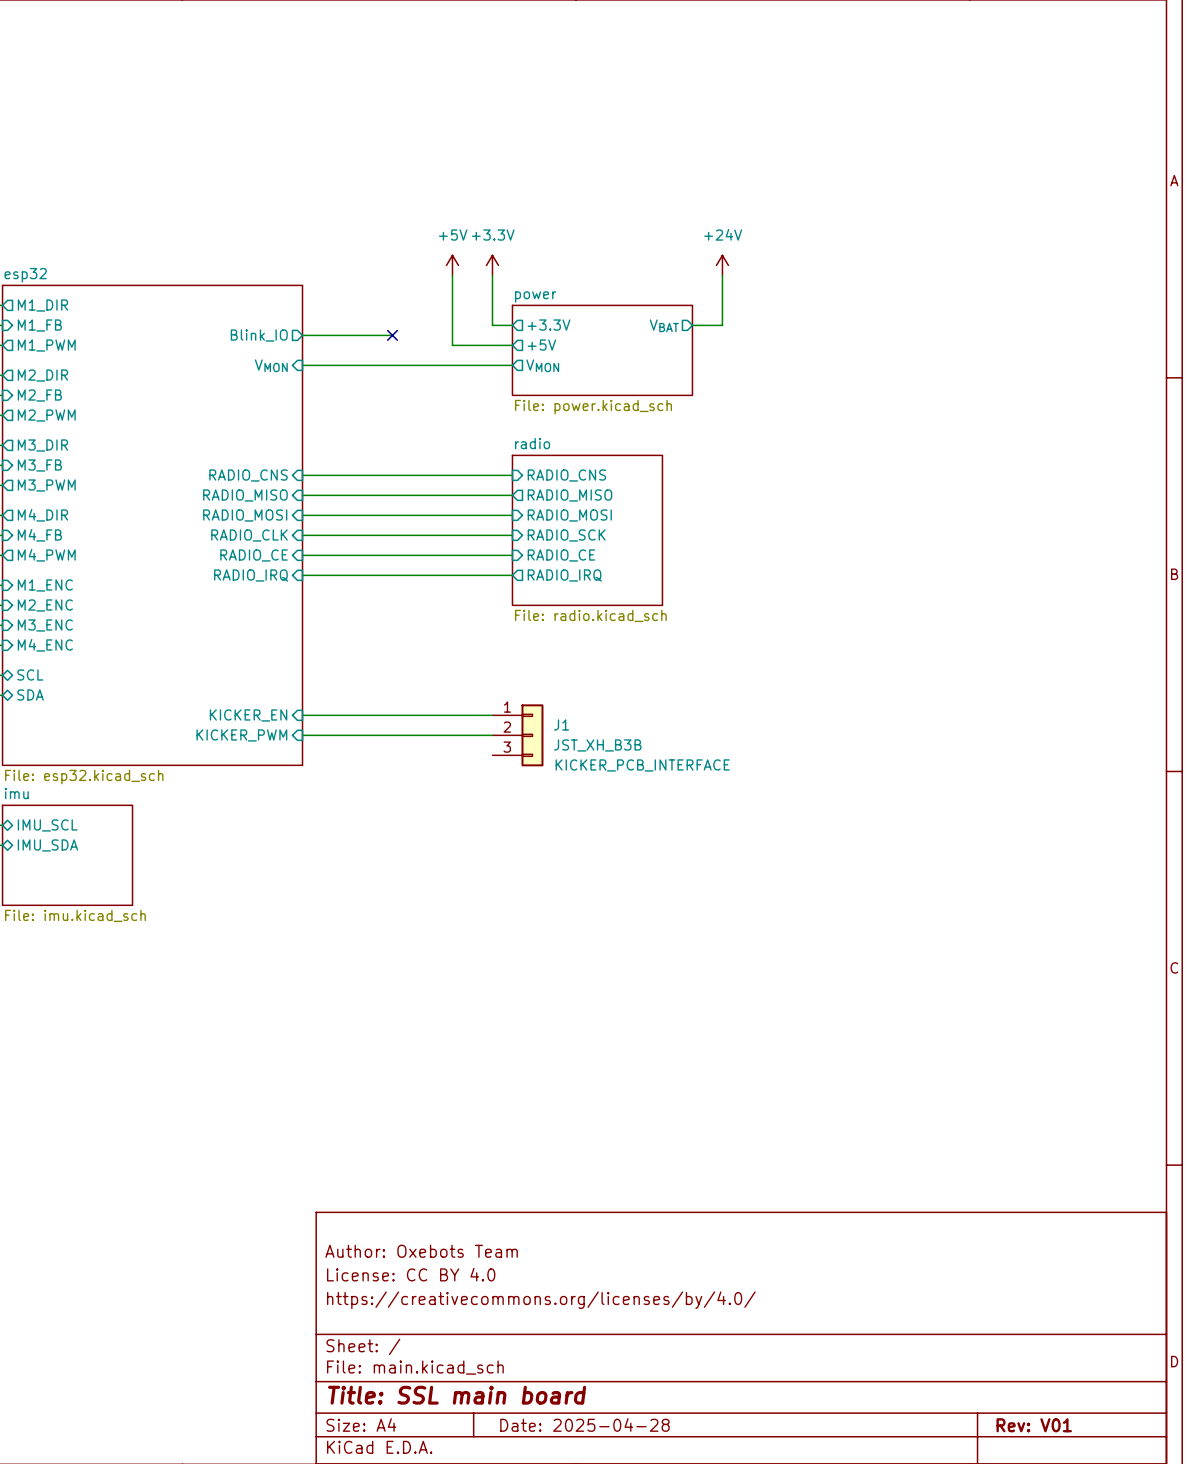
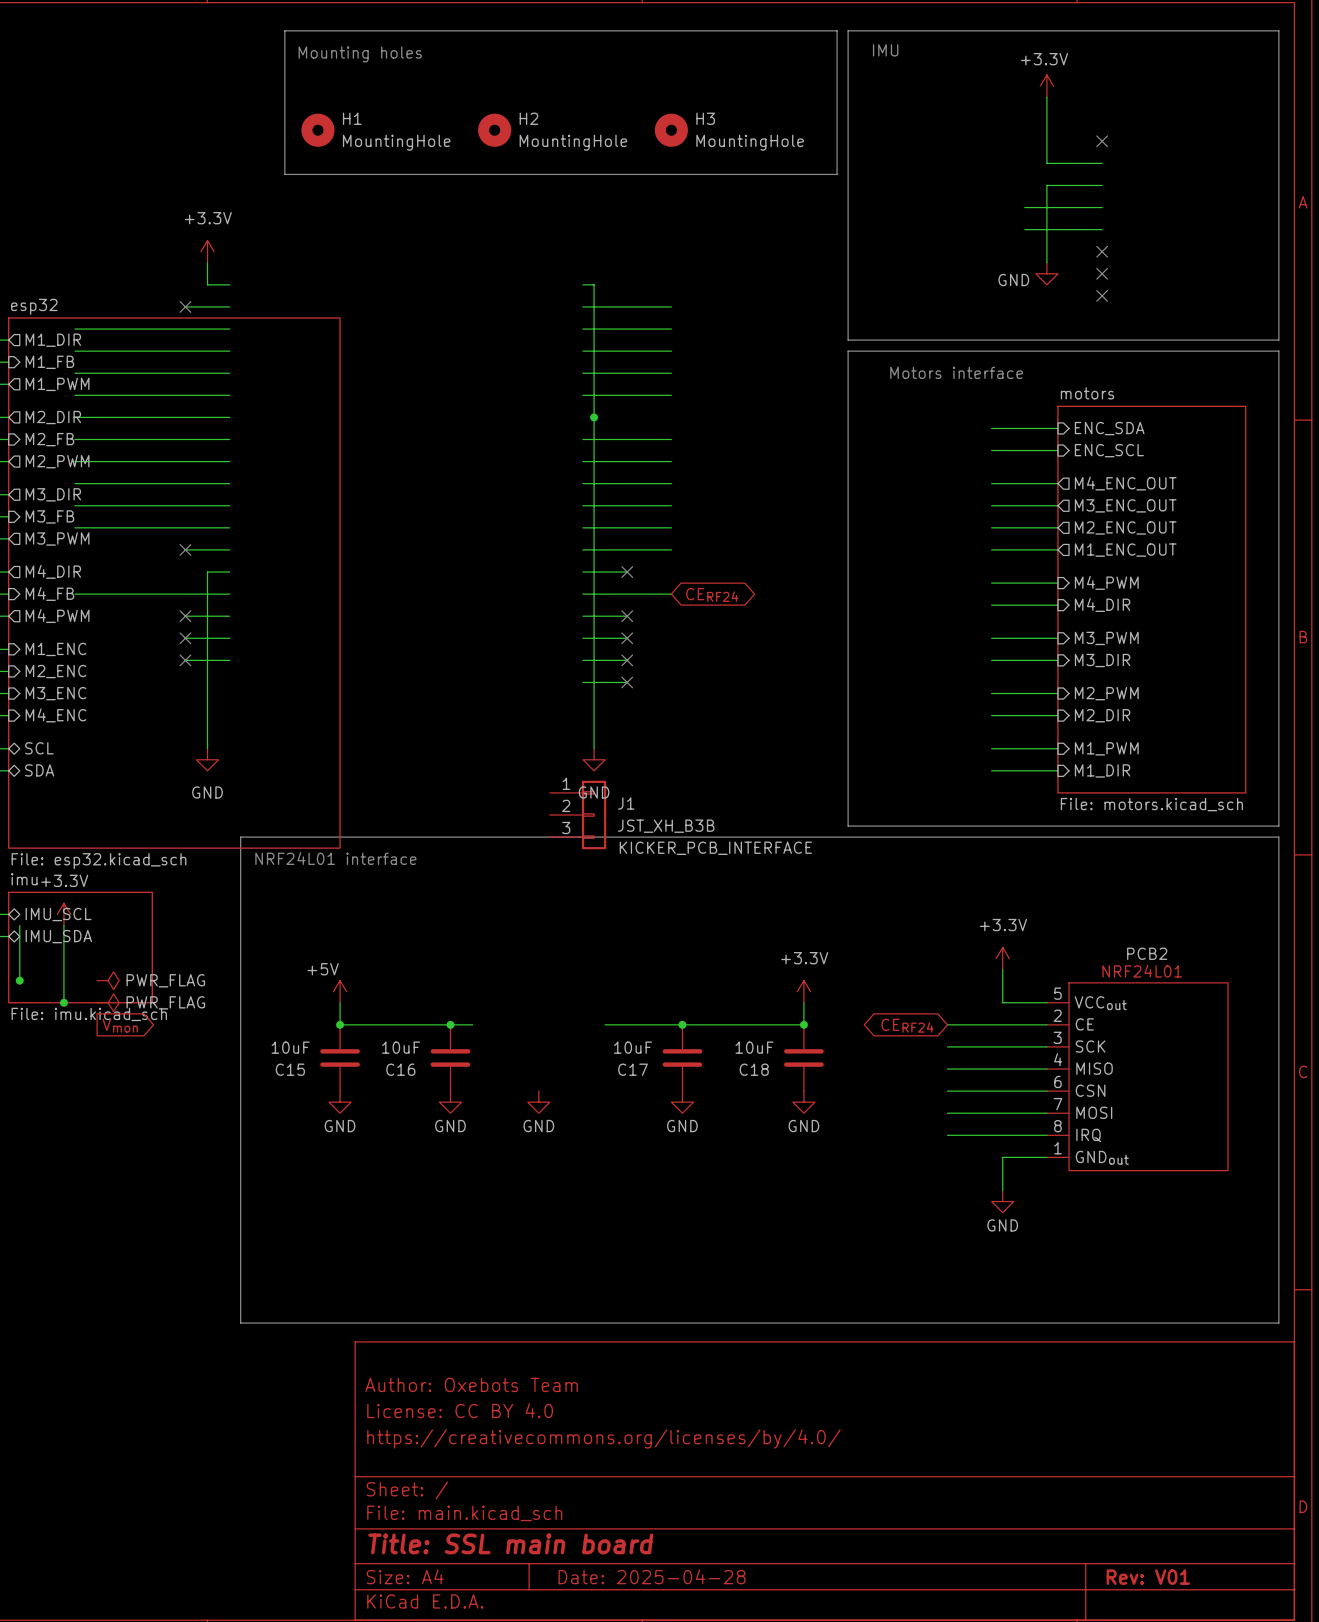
line: none -> (284, 30) (837, 30) (837, 174) (284, 174) (284, 30)
line: none -> (848, 30) (1278, 30) (1278, 340) (848, 340) (848, 30)
text: none -> IMU (885, 50)
text: none -> Mounting holes (360, 54)
power symbol: none -> +3.3V (1046, 86)
wire: none -> (1046, 97) (1046, 163) (1102, 163)
H1: none -> MountingHole (317, 130)
H2: none -> MountingHole (494, 130)
H3: none -> MountingHole (671, 130)
no-connect mark: none -> (1102, 141)
wire: none -> (1102, 185) (1046, 185) (1046, 262)
wire: none -> (1024, 207) (1102, 207)
wire: none -> (1024, 229) (1102, 229)
power symbol: none -> +3.3V (207, 251)
no-connect mark: none -> (1102, 251)
wire: none -> (207, 262) (207, 284) (229, 284)
power symbol: none -> GND (1046, 273)
no-connect mark: none -> (1102, 273)
wire: none -> (583, 284) (594, 284) (594, 748)
power symbol: +5V (452, 265) -> none
power symbol: +3.3V (492, 265) -> none
power symbol: +24V (722, 265) -> none
no-connect mark: none -> (1102, 295)
wire: none -> (185, 306) (229, 306)
no-connect mark: none -> (185, 306)
wire: (452, 275) (452, 345) (512, 345) -> none
wire: (492, 275) (492, 325) (512, 325) -> none
wire: none -> (583, 306) (671, 306)
wire: (722, 275) (722, 325) (692, 325) -> none
wire: none -> (74, 329) (229, 329)
wire: none -> (583, 329) (671, 329)
wire: none -> (74, 351) (229, 351)
wire: none -> (583, 351) (671, 351)
line: none -> (848, 351) (1278, 351) (1278, 826) (848, 826) (848, 351)
sheet pin: +3.3V (549, 325) -> none
sheet pin: VBAT (664, 325) -> none
wire: none -> (74, 373) (229, 373)
sheet pin: Blink_IO (259, 335) -> none
wire: (302, 335) (392, 335) -> none
no-connect mark: (392, 335) -> none
wire: none -> (583, 373) (671, 373)
text: none -> Motors interface (956, 372)
sheet pin: +5V (541, 345) -> none
sheet power: File: power.kicad_sch (602, 350) -> none
wire: none -> (74, 395) (229, 395)
wire: none -> (583, 395) (671, 395)
sheet pin: VMON (271, 365) -> none
wire: (302, 365) (512, 365) -> none
sheet pin: VMON (542, 365) -> none
wire: none -> (74, 417) (229, 417)
junction: none -> (594, 417)
wire: none -> (991, 428) (1057, 428)
sheet pin: none -> ENC_SDA (1109, 428)
wire: none -> (74, 439) (229, 439)
wire: none -> (991, 450) (1057, 450)
sheet pin: none -> ENC_SCL (1109, 450)
wire: none -> (74, 461) (229, 461)
wire: none -> (583, 461) (671, 461)
wire: none -> (74, 483) (229, 483)
wire: none -> (583, 483) (671, 483)
wire: none -> (991, 483) (1057, 483)
sheet pin: none -> M4_ENC_OUT (1125, 483)
wire: none -> (74, 505) (229, 505)
wire: none -> (991, 505) (1057, 505)
sheet pin: none -> M3_ENC_OUT (1125, 505)
wire: none -> (74, 527) (229, 527)
sheet pin: RADIO_CNS (248, 475) -> none
wire: (302, 475) (512, 475) -> none
wire: none -> (583, 527) (671, 527)
sheet pin: RADIO_CNS (566, 475) -> none
wire: none -> (991, 527) (1057, 527)
sheet pin: none -> M2_ENC_OUT (1125, 527)
wire: none -> (185, 549) (229, 549)
no-connect mark: none -> (185, 549)
sheet pin: RADIO_MISO (245, 495) -> none
wire: (302, 495) (512, 495) -> none
wire: none -> (583, 549) (671, 549)
sheet pin: RADIO_MISO (570, 495) -> none
wire: none -> (991, 549) (1057, 549)
sheet pin: none -> M1_ENC_OUT (1125, 550)
wire: none -> (229, 572) (207, 572) (207, 748)
sheet pin: RADIO_MOSI (245, 515) -> none
wire: (302, 515) (512, 515) -> none
wire: none -> (583, 572) (627, 572)
no-connect mark: none -> (627, 572)
sheet pin: RADIO_MOSI (569, 515) -> none
wire: none -> (991, 583) (1057, 583)
sheet pin: none -> M4_PWM (1106, 582)
sheet radio: File: radio.kicad_sch (587, 530) -> none
wire: none -> (74, 594) (229, 594)
sheet pin: RADIO_CLK (249, 535) -> none
wire: (302, 535) (512, 535) -> none
wire: none -> (583, 594) (671, 594)
sheet pin: RADIO_SCK (566, 535) -> none
global label: none -> CERF24 (712, 594)
sheet motors: none -> File: motors.kicad_sch (1151, 599)
wire: none -> (991, 605) (1057, 605)
sheet pin: none -> M4_DIR (1102, 605)
wire: none -> (185, 616) (229, 616)
no-connect mark: none -> (185, 616)
sheet pin: RADIO_CE (254, 555) -> none
wire: (302, 555) (512, 555) -> none
wire: none -> (583, 616) (627, 616)
sheet pin: RADIO_CE (561, 555) -> none
no-connect mark: none -> (627, 616)
wire: none -> (185, 638) (229, 638)
no-connect mark: none -> (185, 638)
sheet pin: RADIO_IRQ (251, 575) -> none
wire: (302, 575) (512, 575) -> none
wire: none -> (583, 638) (627, 638)
no-connect mark: none -> (627, 638)
sheet pin: RADIO_IRQ (564, 575) -> none
wire: none -> (991, 638) (1057, 638)
sheet pin: none -> M3_PWM (1106, 638)
wire: none -> (185, 660) (229, 660)
no-connect mark: none -> (185, 660)
wire: none -> (583, 660) (627, 660)
no-connect mark: none -> (627, 660)
wire: none -> (991, 660) (1057, 660)
sheet pin: none -> M3_DIR (1102, 660)
wire: none -> (583, 682) (627, 682)
no-connect mark: none -> (627, 682)
wire: none -> (991, 693) (1057, 693)
sheet pin: none -> M2_PWM (1106, 693)
wire: none -> (991, 715) (1057, 715)
sheet pin: none -> M2_DIR (1102, 715)
wire: none -> (991, 748) (1057, 748)
sheet pin: none -> M1_PWM (1106, 748)
power symbol: none -> GND (207, 759)
power symbol: none -> GND (594, 759)
wire: none -> (991, 770) (1057, 770)
sheet pin: none -> M1_DIR (1102, 770)
sheet pin: KICKER_EN (248, 715) -> none
wire: (302, 715) (492, 715) -> none
sheet pin: KICKER_PWM (241, 735) -> none
wire: (302, 735) (492, 735) -> none
line: none -> (240, 837) (1278, 837) (1278, 1323) (240, 1323) (240, 837)
text: none -> NRF24L01 interface (335, 858)
power symbol: none -> +3.3V (63, 914)
wire: none -> (19, 925) (19, 980)
wire: none -> (63, 925) (63, 1002)
power symbol: none -> +3.3V (1002, 958)
wire: none -> (1002, 969) (1002, 1002) (1046, 1002)
junction: none -> (19, 980)
power symbol: none -> PWR_FLAG (108, 980)
power symbol: none -> +5V (340, 991)
power symbol: none -> +3.3V (803, 991)
junction: none -> (63, 1002)
power symbol: none -> PWR_FLAG (108, 1002)
wire: none -> (340, 1002) (340, 1024) (472, 1024)
wire: none -> (803, 1002) (803, 1024) (605, 1024)
junction: none -> (340, 1024)
junction: none -> (450, 1024)
junction: none -> (682, 1024)
junction: none -> (803, 1024)
wire: none -> (947, 1024) (1046, 1024)
global label: none -> Vmon (120, 1025)
global label: none -> CERF24 (907, 1025)
wire: none -> (947, 1046) (1046, 1046)
C15: none -> 10uF (340, 1057)
C16: none -> 10uF (450, 1057)
C17: none -> 10uF (682, 1057)
C18: none -> 10uF (803, 1057)
wire: none -> (947, 1069) (1046, 1069)
PCB2: none -> (1137, 1076)
wire: none -> (947, 1091) (1046, 1091)
power symbol: none -> GND (340, 1102)
power symbol: none -> GND (450, 1102)
power symbol: none -> GND (538, 1102)
power symbol: none -> GND (682, 1102)
power symbol: none -> GND (803, 1102)
wire: none -> (947, 1113) (1046, 1113)
wire: none -> (947, 1135) (1046, 1135)
wire: none -> (1046, 1157) (1002, 1157) (1002, 1190)
power symbol: none -> GND (1002, 1201)

